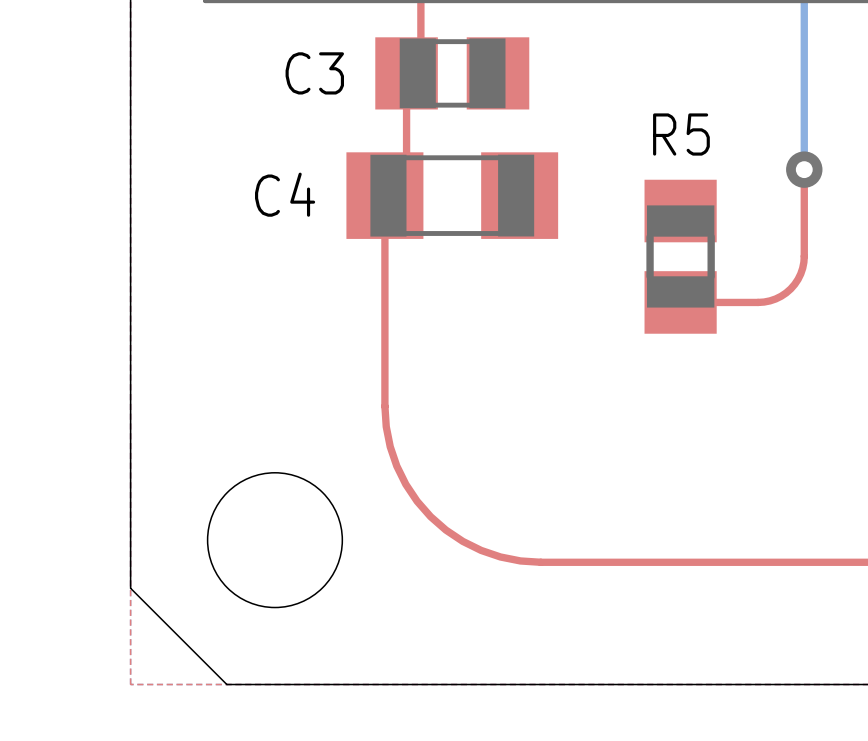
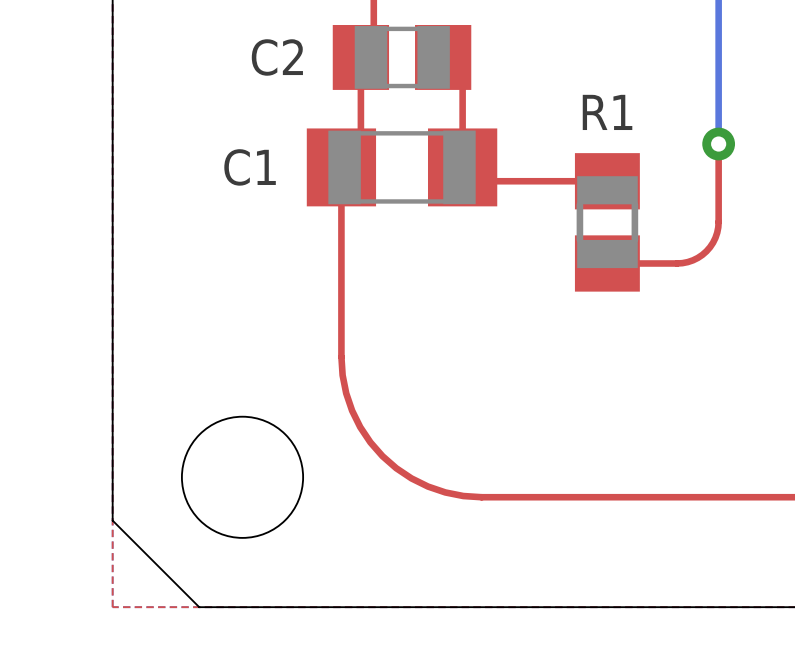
C3 name: C3 (314, 73) -> C2 (277, 57)
top track: none -> (443, 57) (462, 76) (462, 167) (476, 181) (607, 181) (622, 195)
R5 name: R5 (681, 134) -> R1 (607, 112)
C4 name: C4 (285, 194) -> C1 (250, 167)

